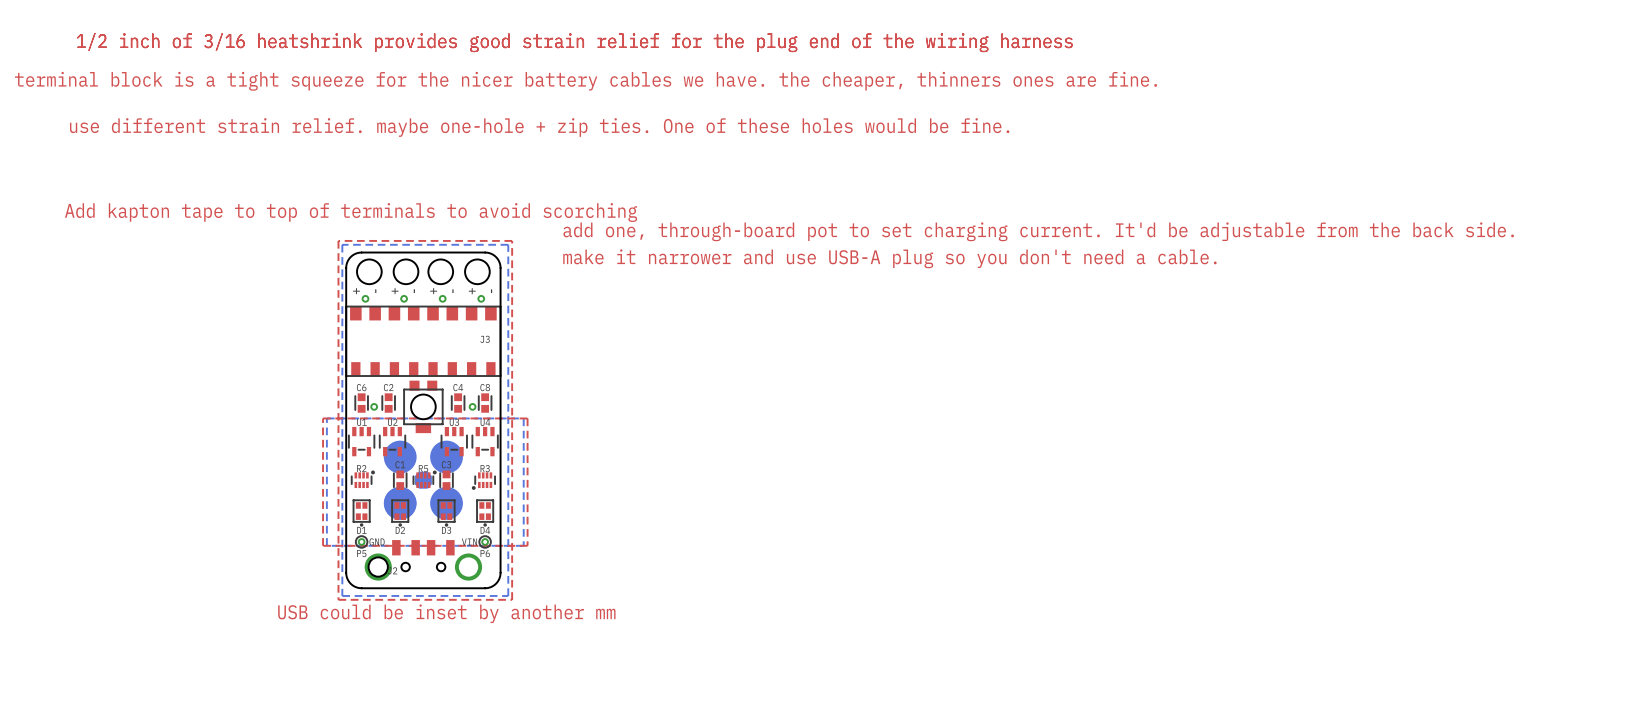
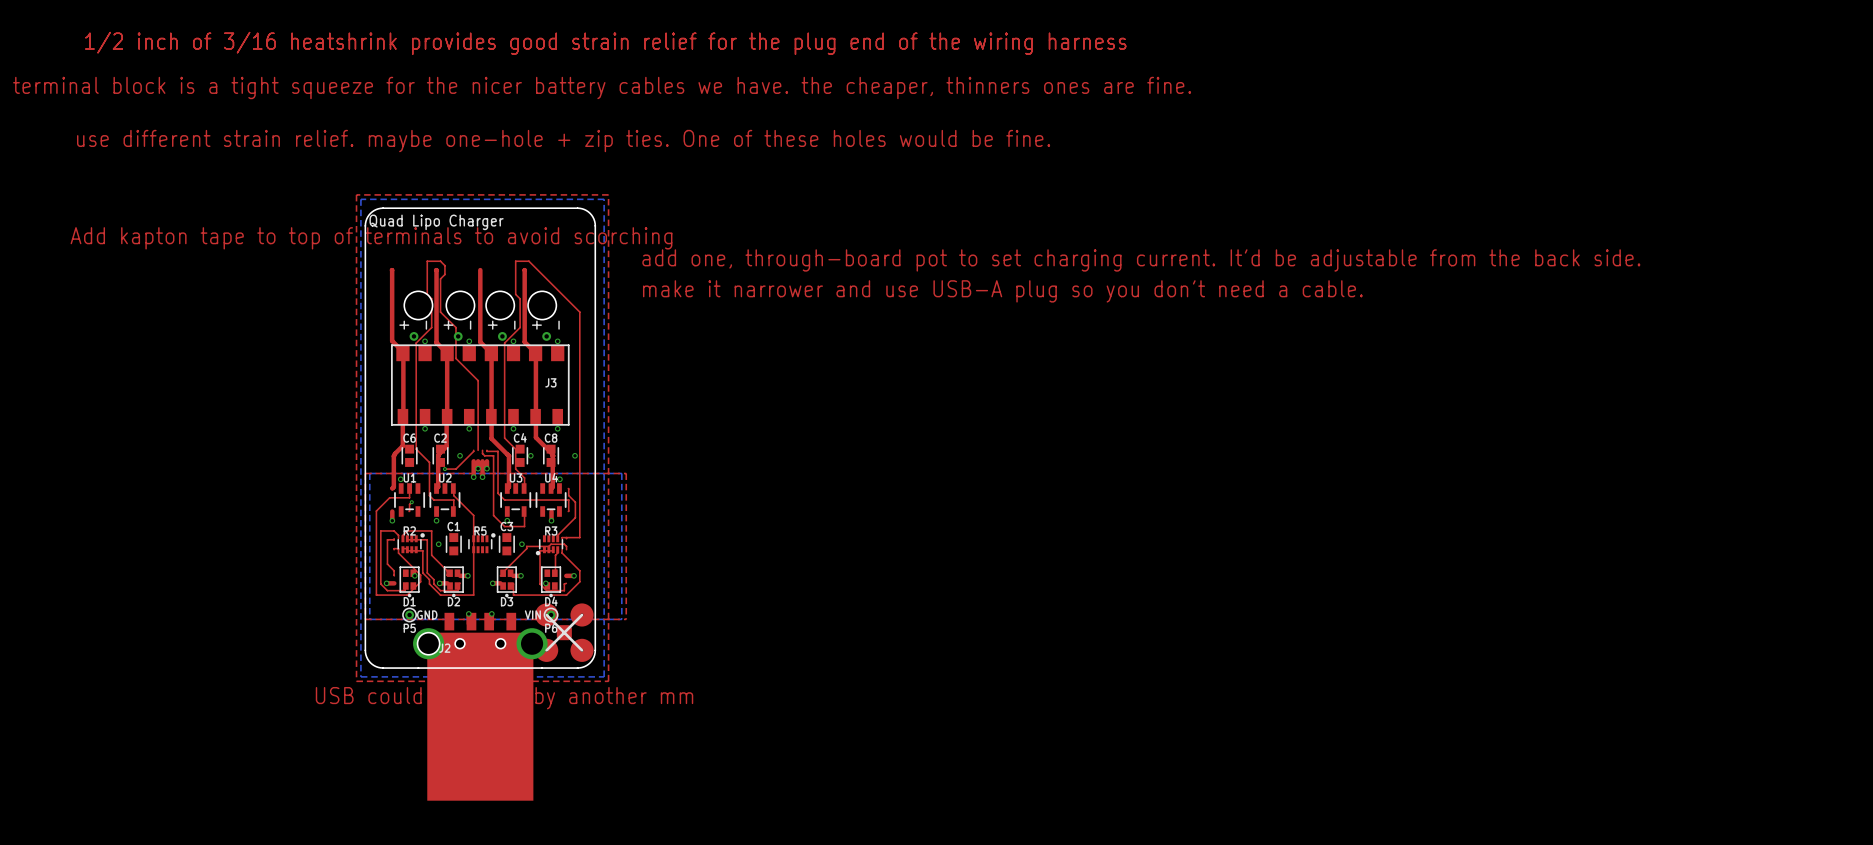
text: none -> Quad Lipo Charger (436, 222)
top track: none -> (391, 270) (392, 340) (403, 353) (402, 445) (393, 456) (392, 488)
top track: none -> (436, 270) (436, 342) (447, 353)
top track: none -> (480, 270) (480, 342) (491, 353) (491, 438) (509, 455) (508, 486) (507, 488)
top track: none -> (524, 270) (524, 342) (535, 353) (535, 437) (553, 455) (551, 488)
via: none -> (425, 341)
via: none -> (469, 341)
via: none -> (513, 341)
via: none -> (557, 341)
top track: none -> (447, 353) (446, 446) (438, 456) (438, 486) (436, 488)
via: none -> (425, 428)
via: none -> (469, 428)
via: none -> (513, 428)
via: none -> (557, 428)
top track: none -> (473, 450) (456, 469) (444, 469)
top track: none -> (478, 450) (478, 380) (456, 358) (456, 327) (440, 312) (440, 278) (444, 274) (444, 265) (440, 261) (427, 261) (427, 294) (431, 298) (431, 327) (416, 343) (416, 449) (429, 462) (429, 495) (433, 500) (453, 500) (453, 511)
top track: none -> (482, 450) (484, 455) (493, 455) (493, 515) (504, 526) (524, 526) (524, 511)
top track: none -> (486, 450) (498, 451) (498, 493) (504, 500) (568, 500) (568, 511)
via: none -> (460, 455)
via: none -> (530, 455)
via: none -> (574, 455)
part: (374, 406) -> none
part: (423, 406) -> none
part: (472, 406) -> none
top track: none -> (473, 461) (473, 477)
top track: none -> (478, 461) (478, 468)
top track: none -> (482, 461) (482, 477)
top track: none -> (486, 461) (486, 468)
via: none -> (444, 469)
via: none -> (478, 468)
via: none -> (486, 468)
bottom zone outline: (523, 418) (523, 545) -> (595, 473) (621, 473) (621, 619) (595, 619)
top zone outline: (527, 418) (527, 545) -> (599, 473) (626, 473) (626, 619) (599, 619)
via: none -> (473, 477)
via: none -> (482, 477)
via: none -> (400, 479)
via: none -> (559, 479)
top track: none -> (409, 488) (409, 497) (389, 497) (376, 511) (376, 595) (407, 595) (420, 581) (420, 575) (398, 553) (398, 548) (394, 549)
top track: none -> (453, 488) (453, 495) (473, 515) (473, 595) (440, 595) (429, 584) (429, 579) (422, 572) (422, 550) (402, 549)
top track: none -> (524, 488) (524, 477) (515, 469) (515, 449) (504, 438) (504, 343) (520, 327) (520, 298) (515, 294) (515, 261) (528, 261) (579, 312) (579, 537) (562, 538)
top track: none -> (568, 488) (568, 495) (575, 502) (575, 517) (557, 535) (557, 538)
drawing: [384, 441, 463, 520] -> none
top track: none -> (411, 502) (409, 504) (409, 511)
via: none -> (411, 502)
top track: none -> (392, 511) (392, 520)
top track: none -> (551, 511) (551, 520)
via: none -> (392, 520)
via: none -> (436, 520)
via: none -> (507, 520)
via: none -> (551, 520)
top track: none -> (566, 537) (566, 538)
top track: none -> (394, 538) (387, 539) (387, 564) (394, 570) (394, 575)
top track: none -> (398, 538) (398, 535) (394, 530) (380, 530) (380, 584) (387, 590) (405, 590) (405, 584) (407, 583)
top track: none -> (402, 538) (402, 535) (407, 530) (431, 530) (431, 555) (447, 570) (447, 575)
top track: none -> (407, 538) (427, 539) (427, 572) (440, 590) (458, 590) (458, 584) (460, 583)
via: none -> (438, 544)
via: none -> (521, 544)
top track: none -> (553, 549) (540, 550) (540, 584) (546, 590) (564, 590) (564, 584) (566, 583)
top track: none -> (557, 549) (555, 555) (555, 575) (553, 575)
top track: none -> (562, 549) (562, 553) (579, 570) (579, 581) (566, 595) (513, 595) (513, 583)
top track: none -> (566, 549) (564, 544) (526, 546) (500, 575)
via: none -> (414, 575)
top track: none -> (460, 575) (467, 575)
via: none -> (467, 575)
top track: none -> (513, 575) (520, 575)
via: none -> (520, 575)
top track: none -> (566, 575) (574, 575)
via: none -> (574, 575)
top track: none -> (386, 583) (394, 583)
via: none -> (386, 583)
top track: none -> (439, 583) (447, 583)
via: none -> (439, 583)
top track: none -> (492, 583) (500, 583)
via: none -> (492, 583)
via: none -> (545, 583)
drawing: none -> [427, 603, 594, 801]
via: none -> (468, 613)
via: none -> (491, 613)
board edge: (361, 588) (350, 583) (346, 572) (346, 267) (350, 257) (361, 252) (487, 252) (494, 255) (499, 262) (500, 572) (496, 583) (485, 588) -> (409, 668) (376, 666) (367, 659) (365, 650) (365, 225) (370, 213) (383, 208) (577, 208) (586, 210) (593, 219) (595, 652) (591, 661) (584, 666) (551, 668)
bottom zone outline: (342, 595) (342, 244) (508, 244) (508, 595) -> (387, 676) (360, 676) (360, 199) (604, 199) (604, 676) (577, 676)
top zone outline: (338, 599) (338, 240) (512, 240) (512, 599) -> (383, 681) (356, 681) (356, 194) (608, 194) (608, 681) (582, 681)

